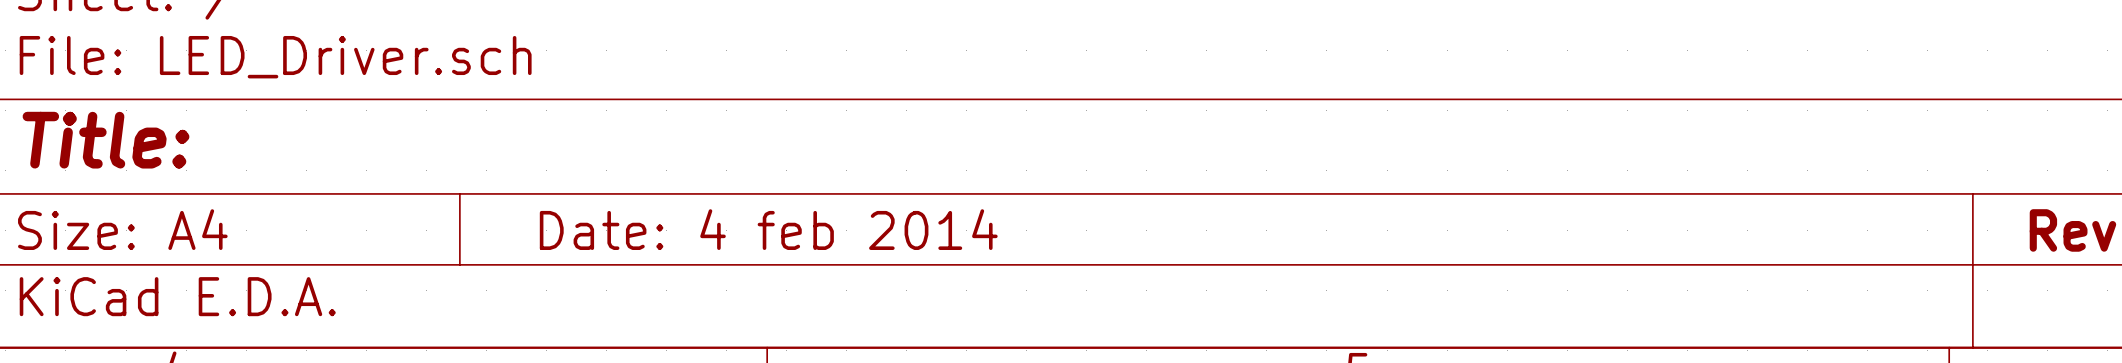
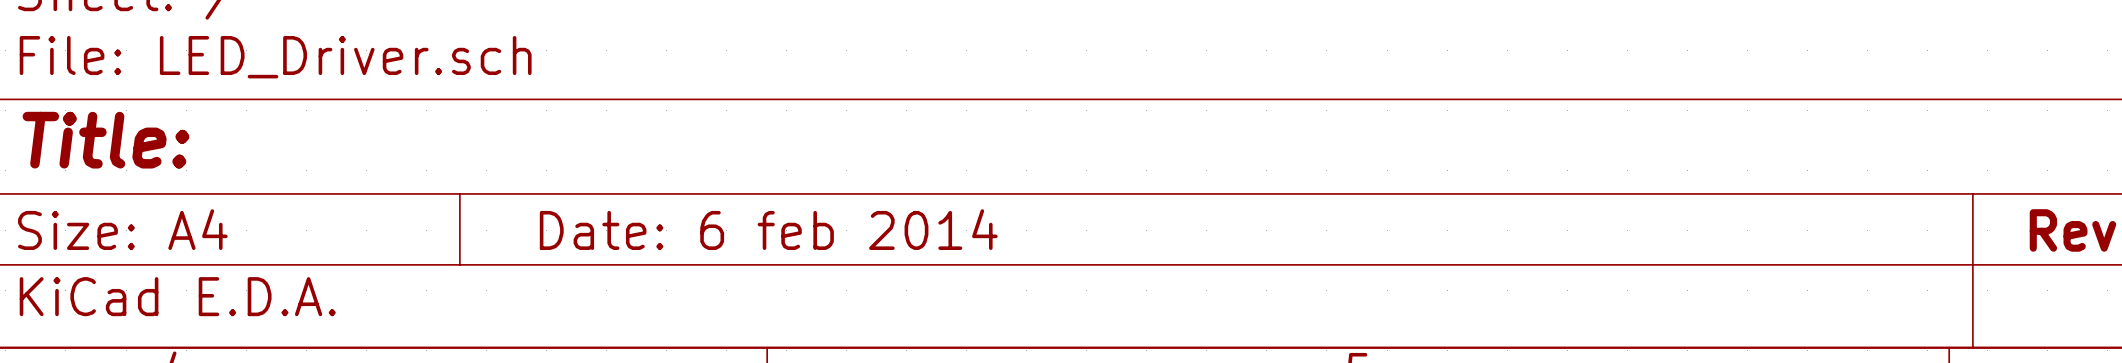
title block: Date: 4 feb 2014 (768, 229) -> Date: 6 feb 2014 (768, 229)

